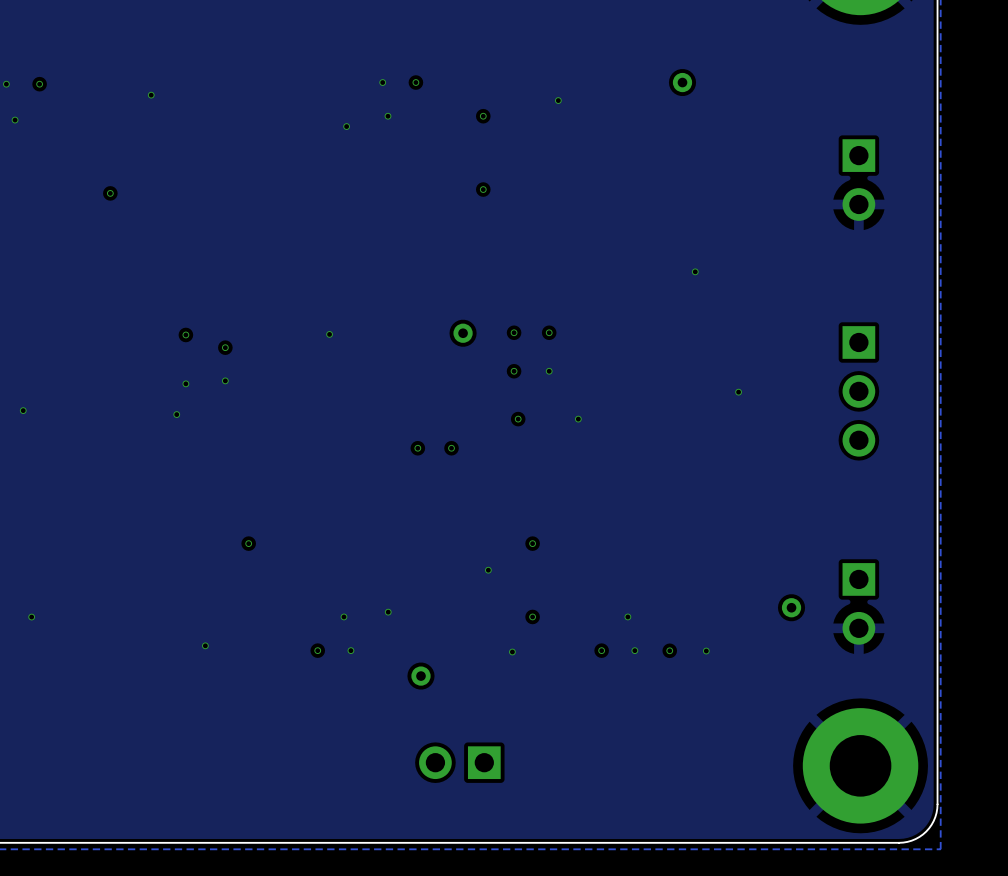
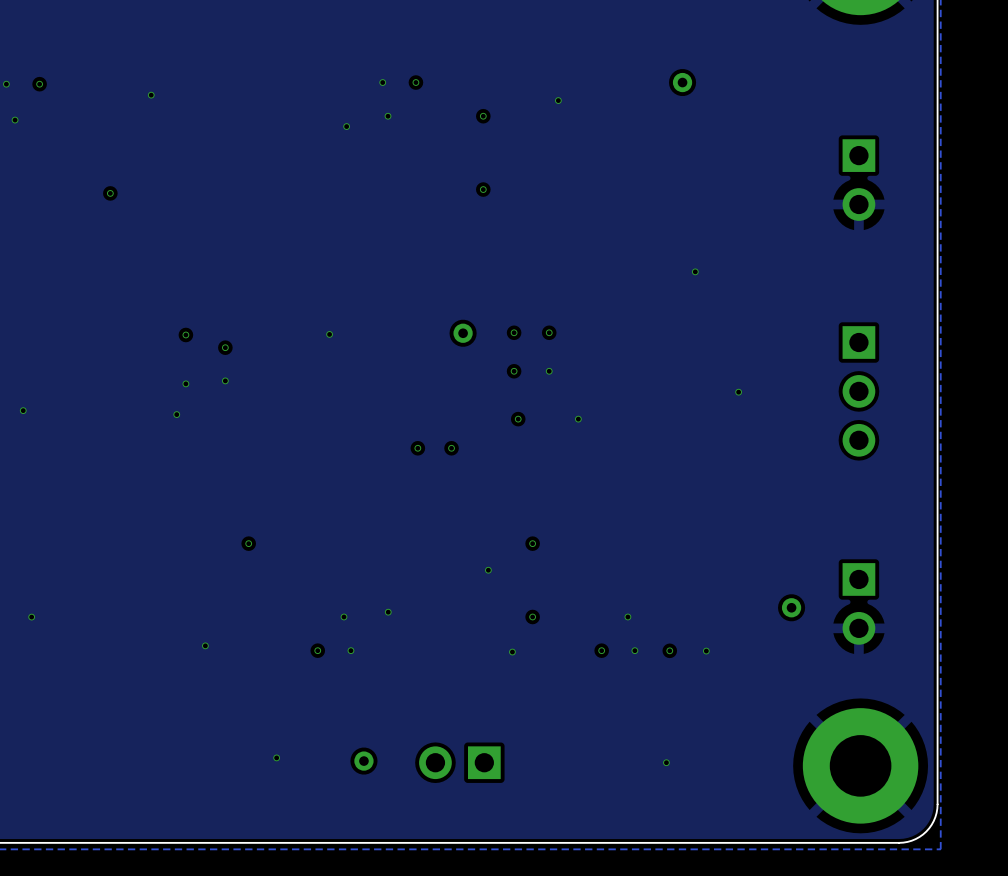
part position: (420, 676) -> (363, 761)
via: none -> (276, 757)
via: none -> (666, 762)

